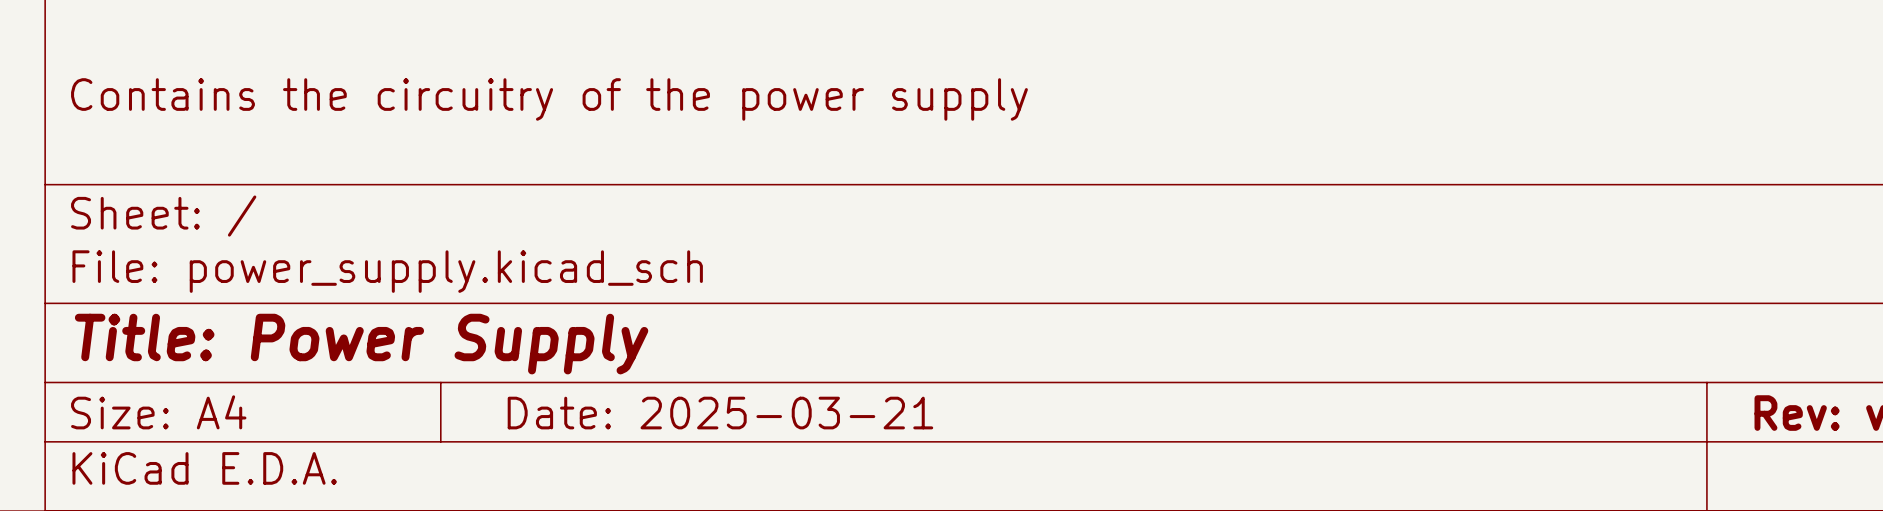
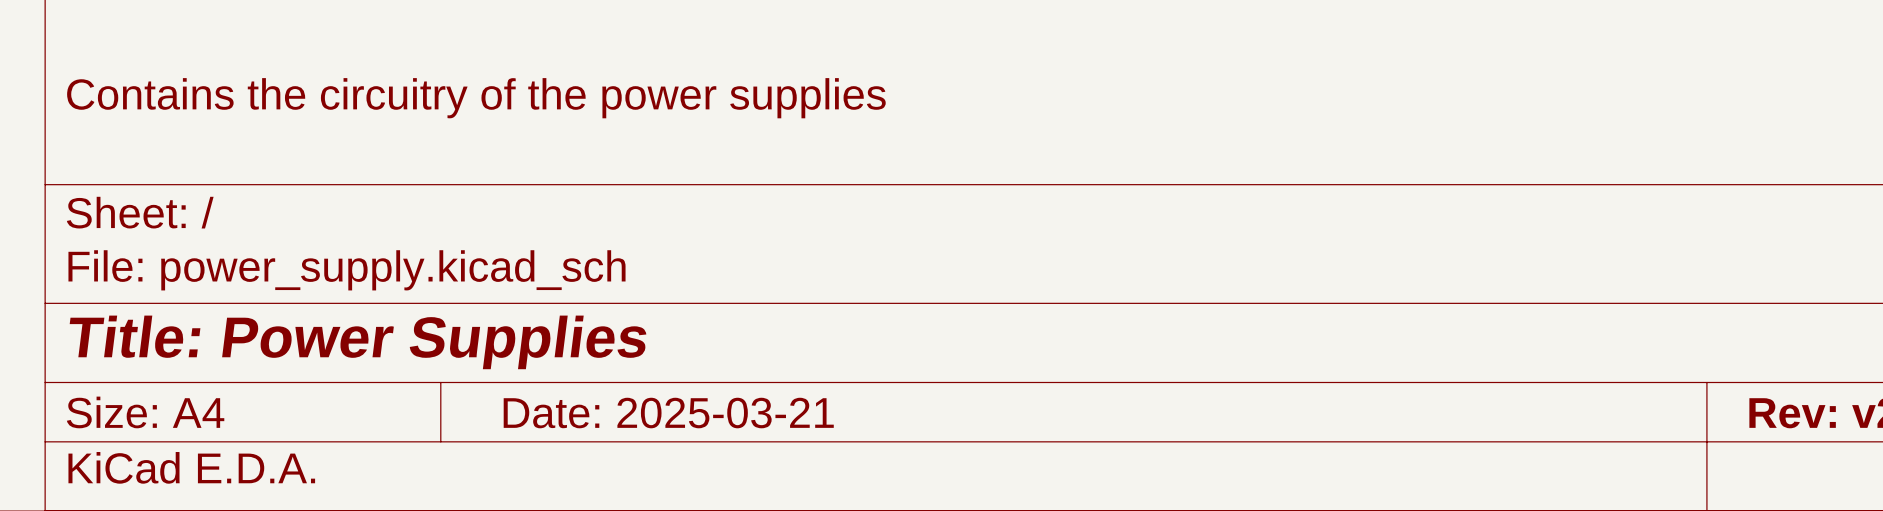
title block: Contains the circuitry of the power supply (549, 99) -> Contains the circuitry of the power supplies (476, 98)
title block: Title: Power Supply (361, 344) -> Title: Power Supplies (358, 342)

